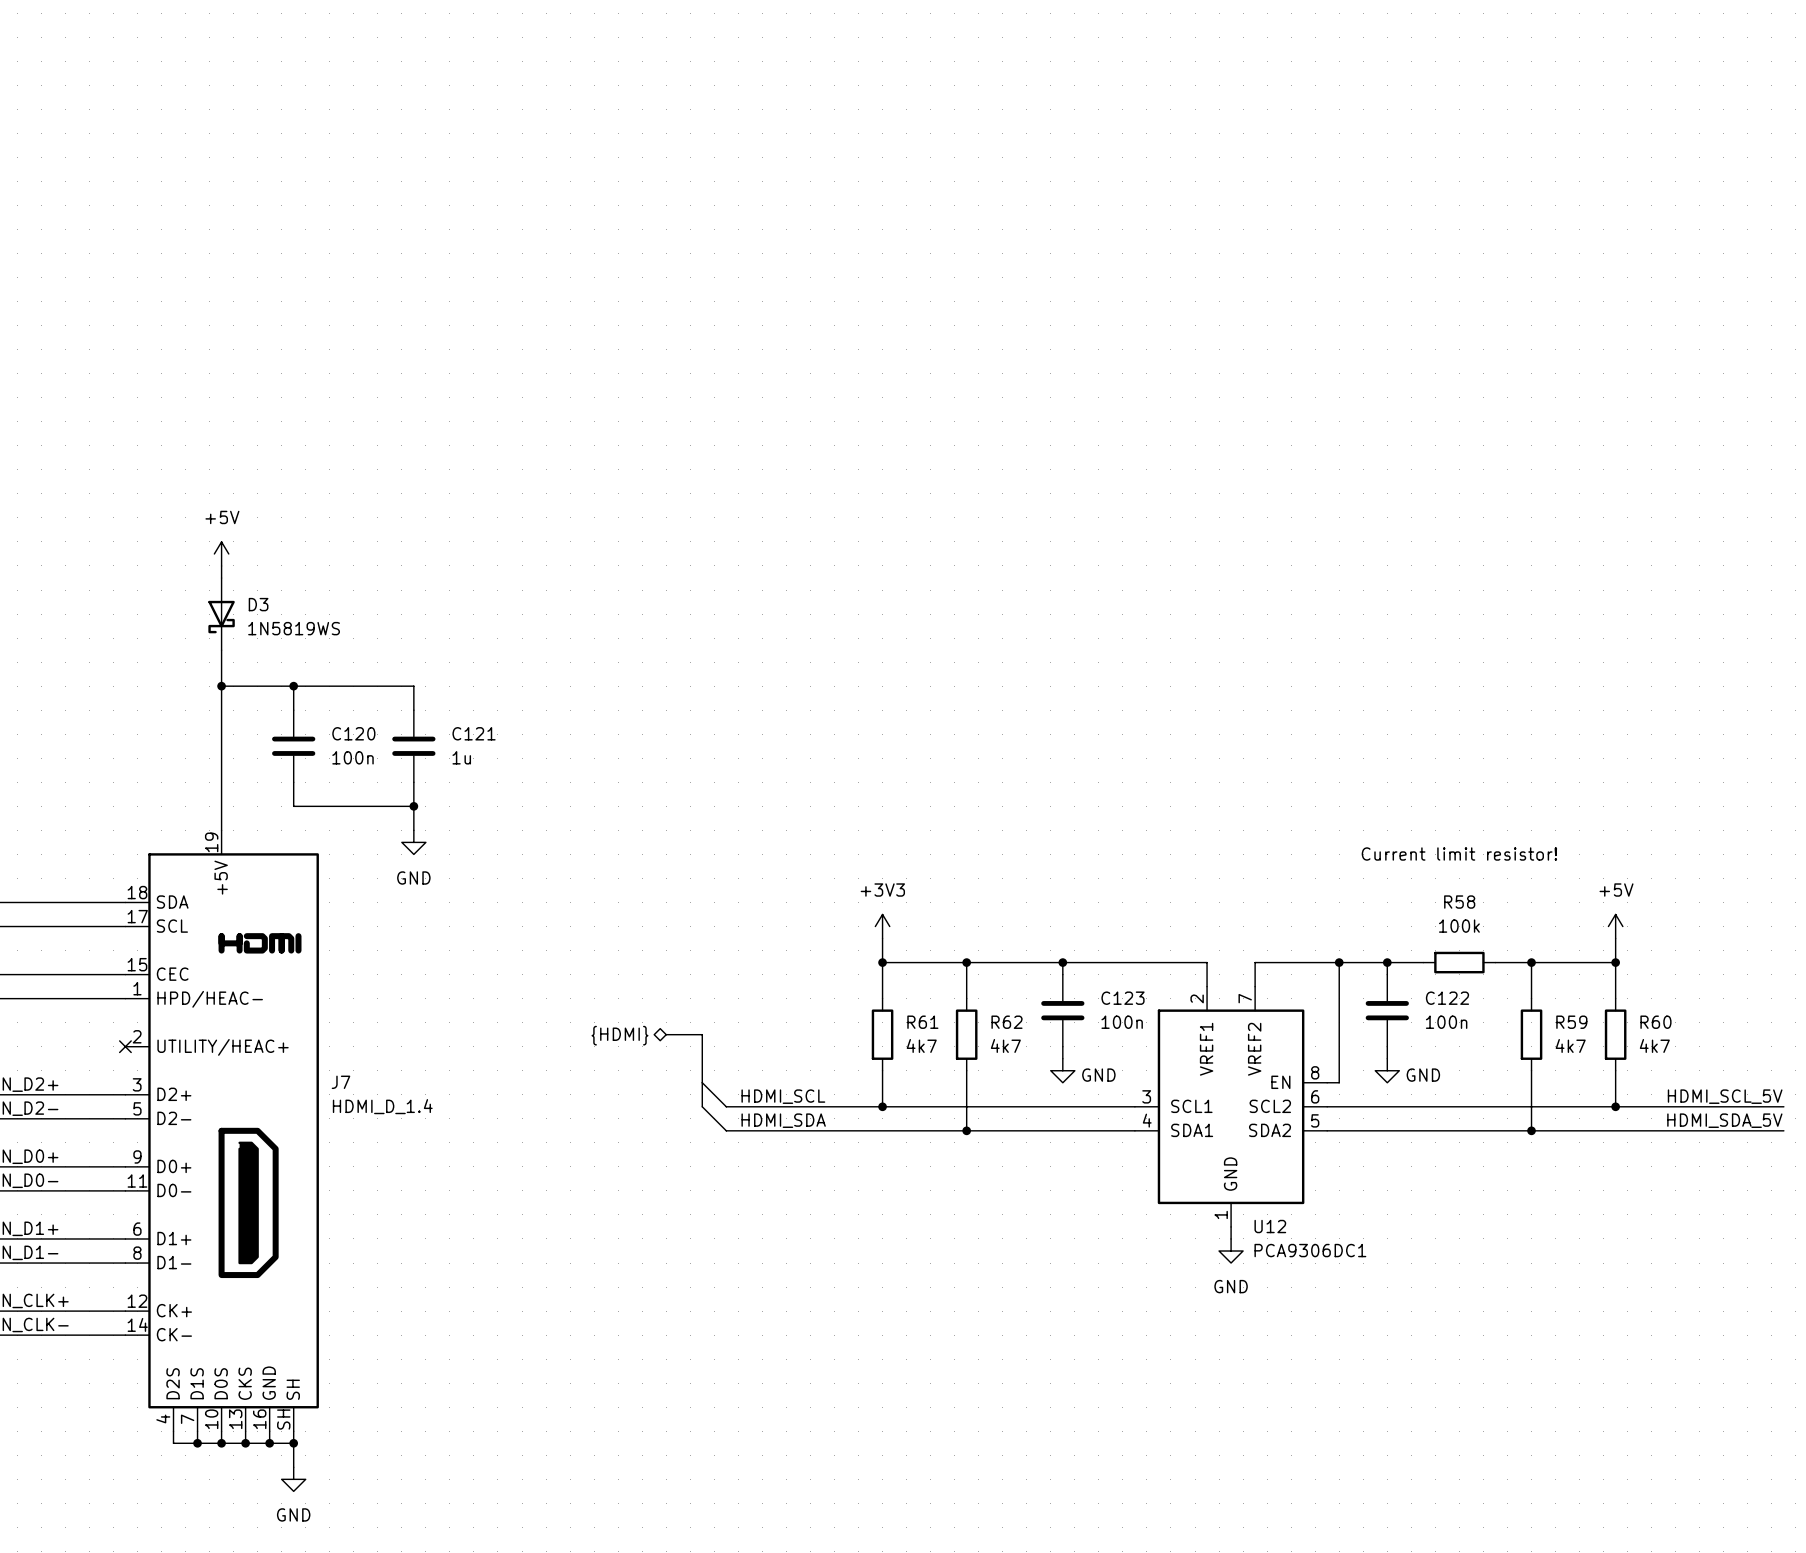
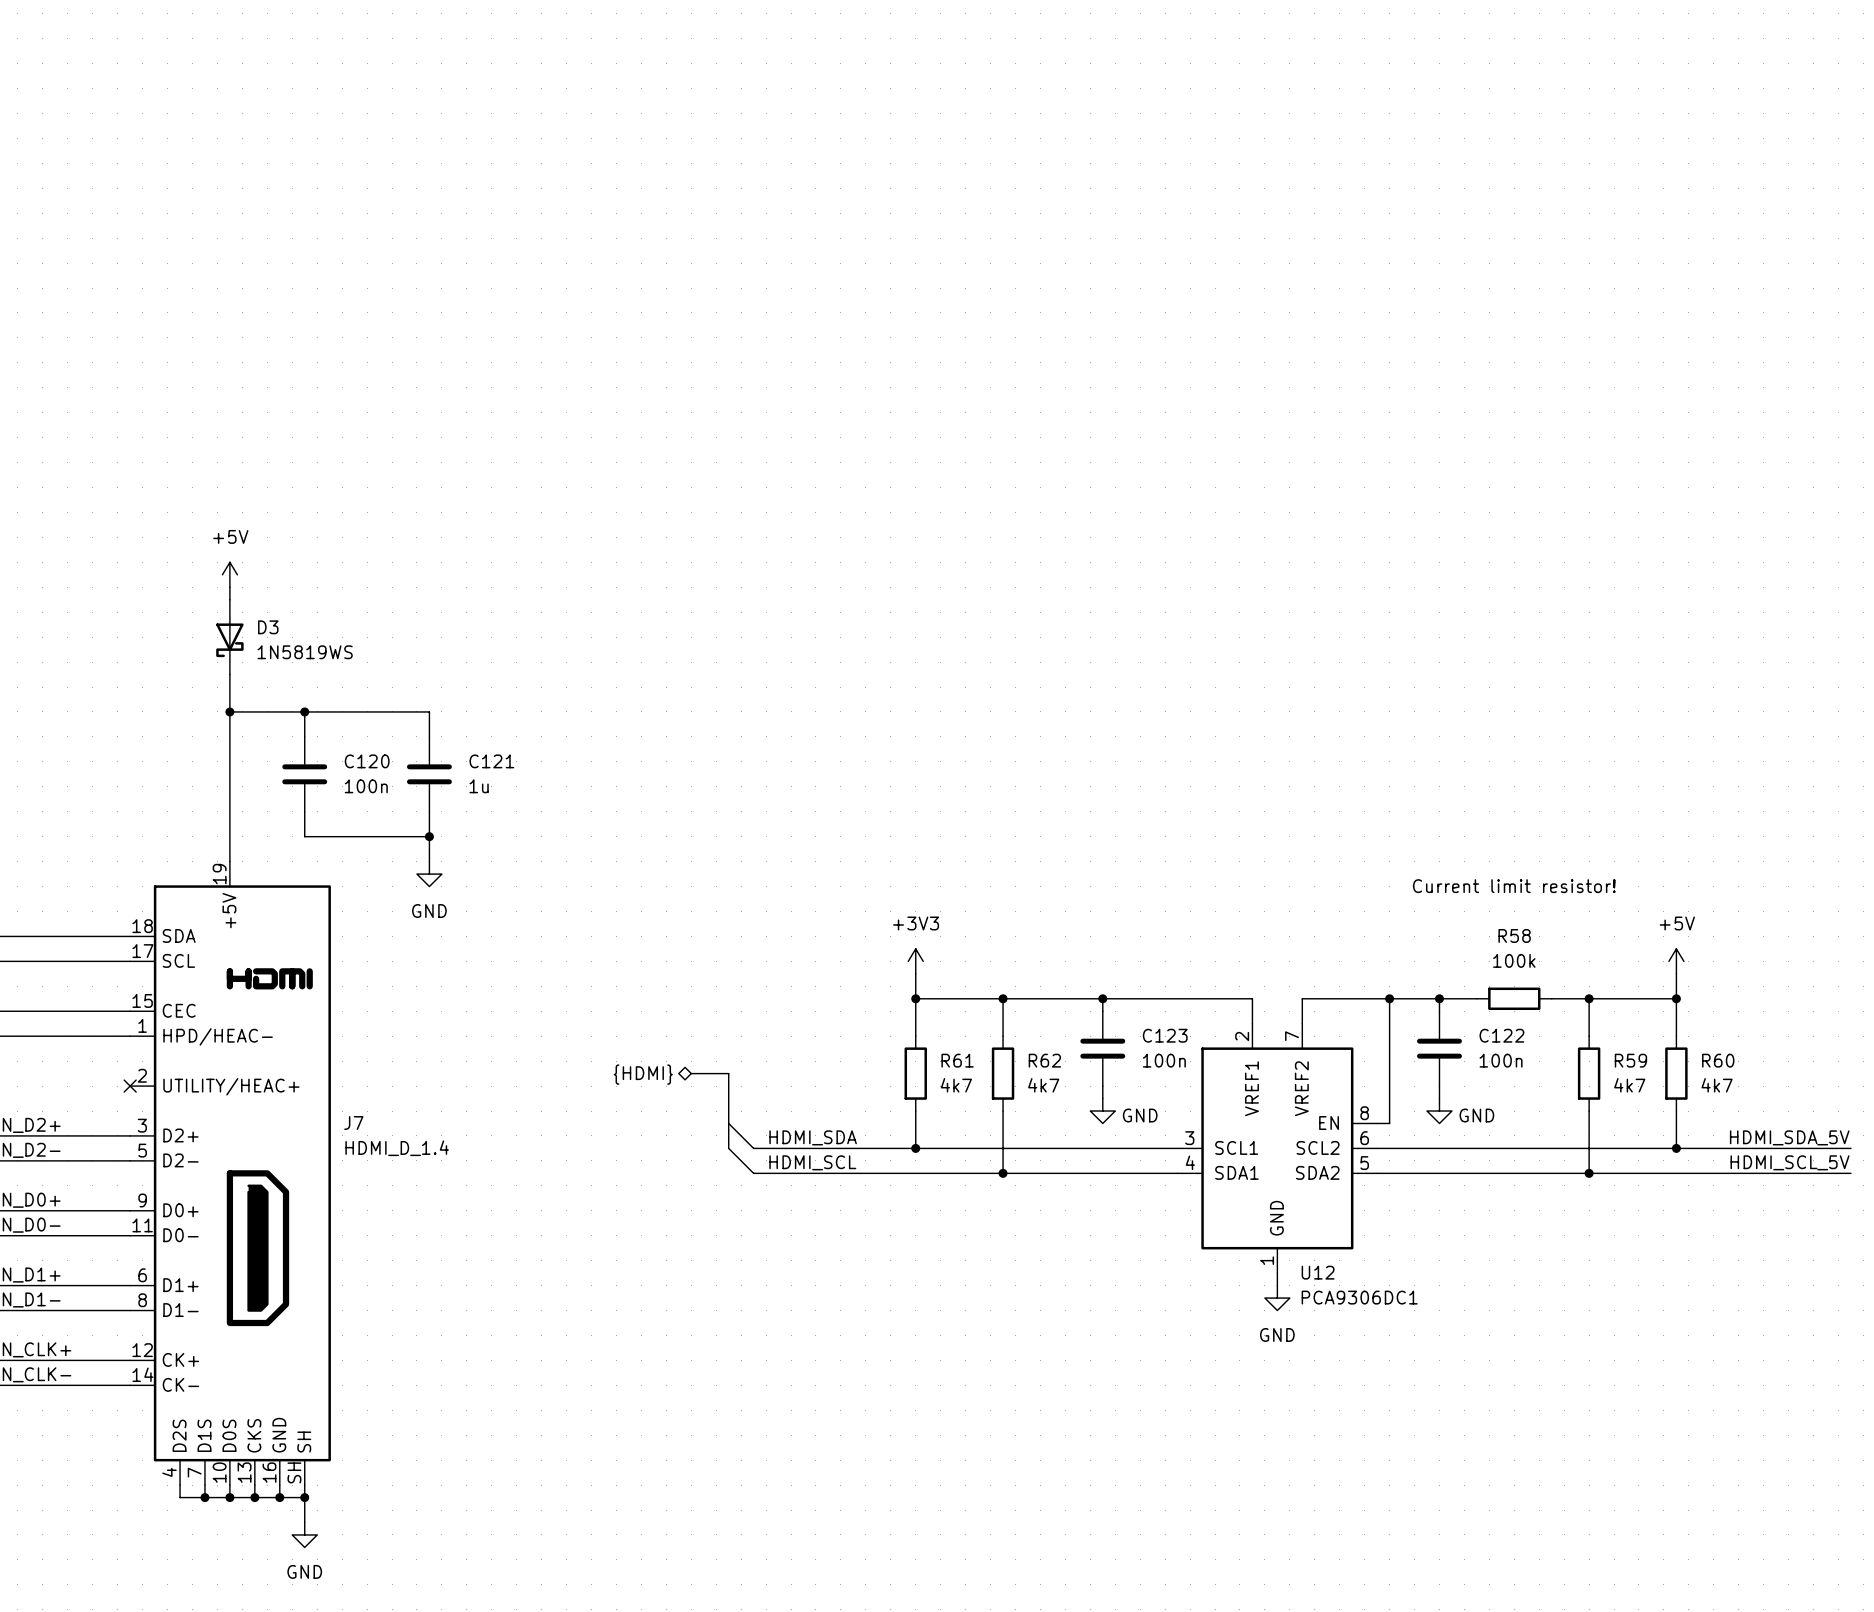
label: HDMI_SCL (783, 1096) -> HDMI_SDA (813, 1137)
label: HDMI_SCL_5V (1725, 1096) -> HDMI_SDA_5V (1789, 1137)
label: HDMI_SDA (783, 1120) -> HDMI_SCL (812, 1162)
label: HDMI_SDA_5V (1724, 1120) -> HDMI_SCL_5V (1790, 1162)

